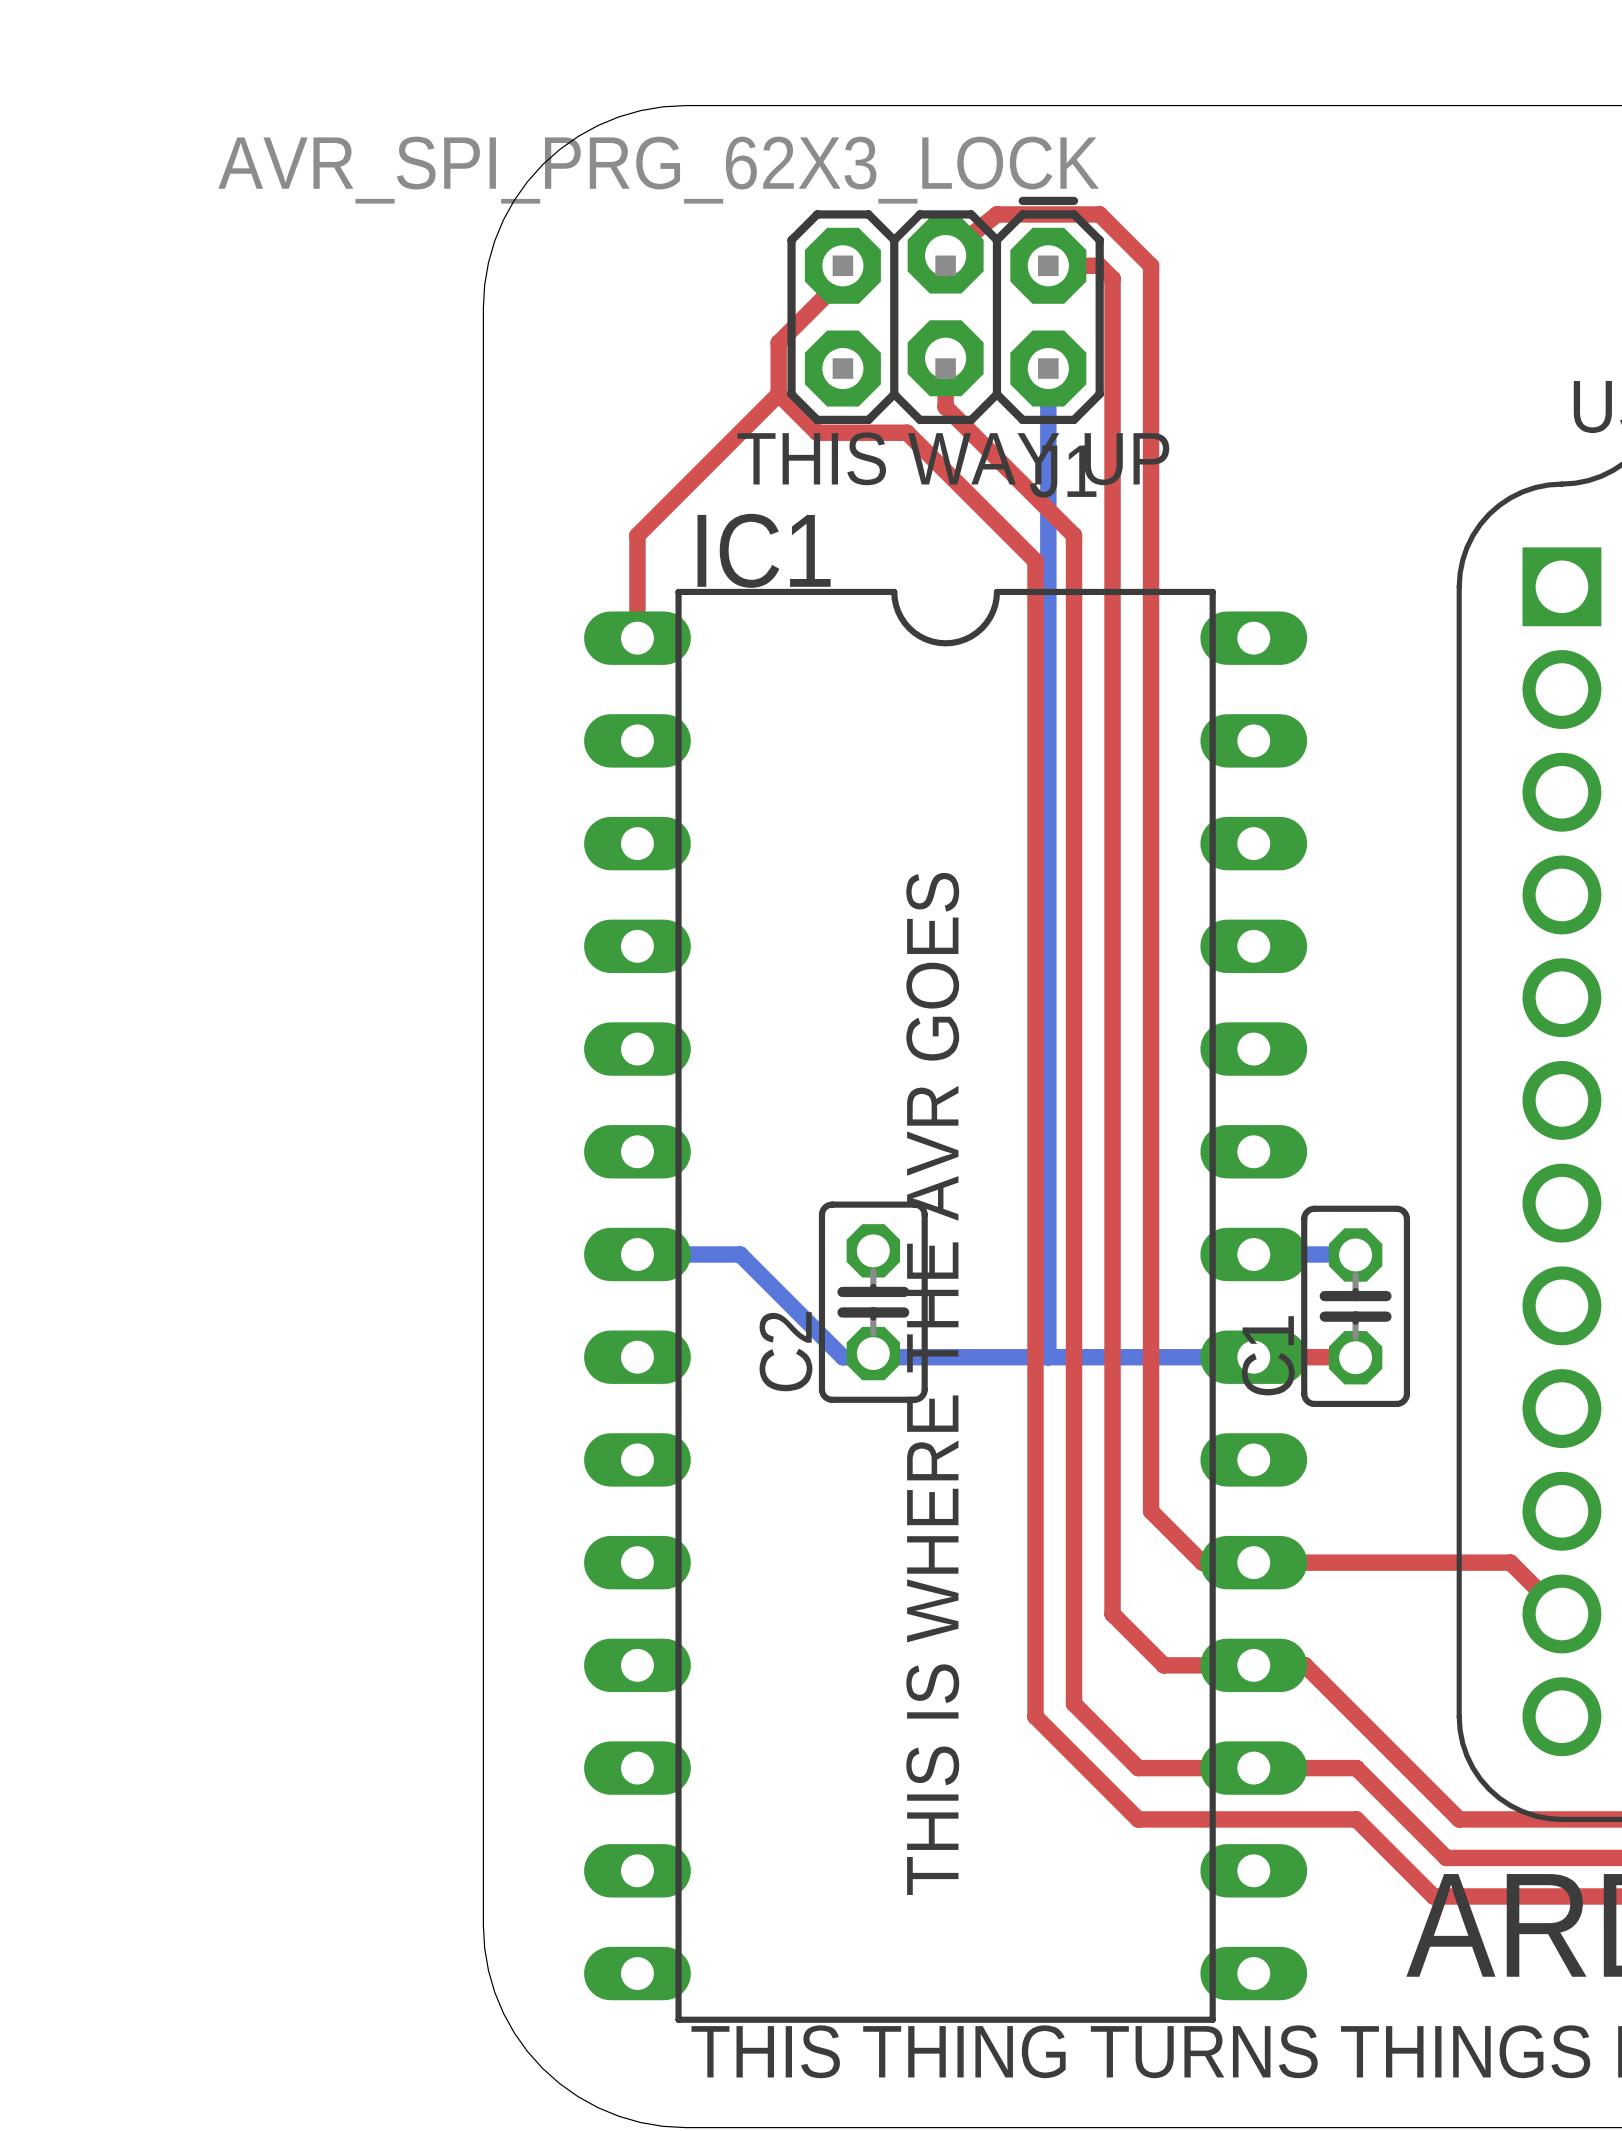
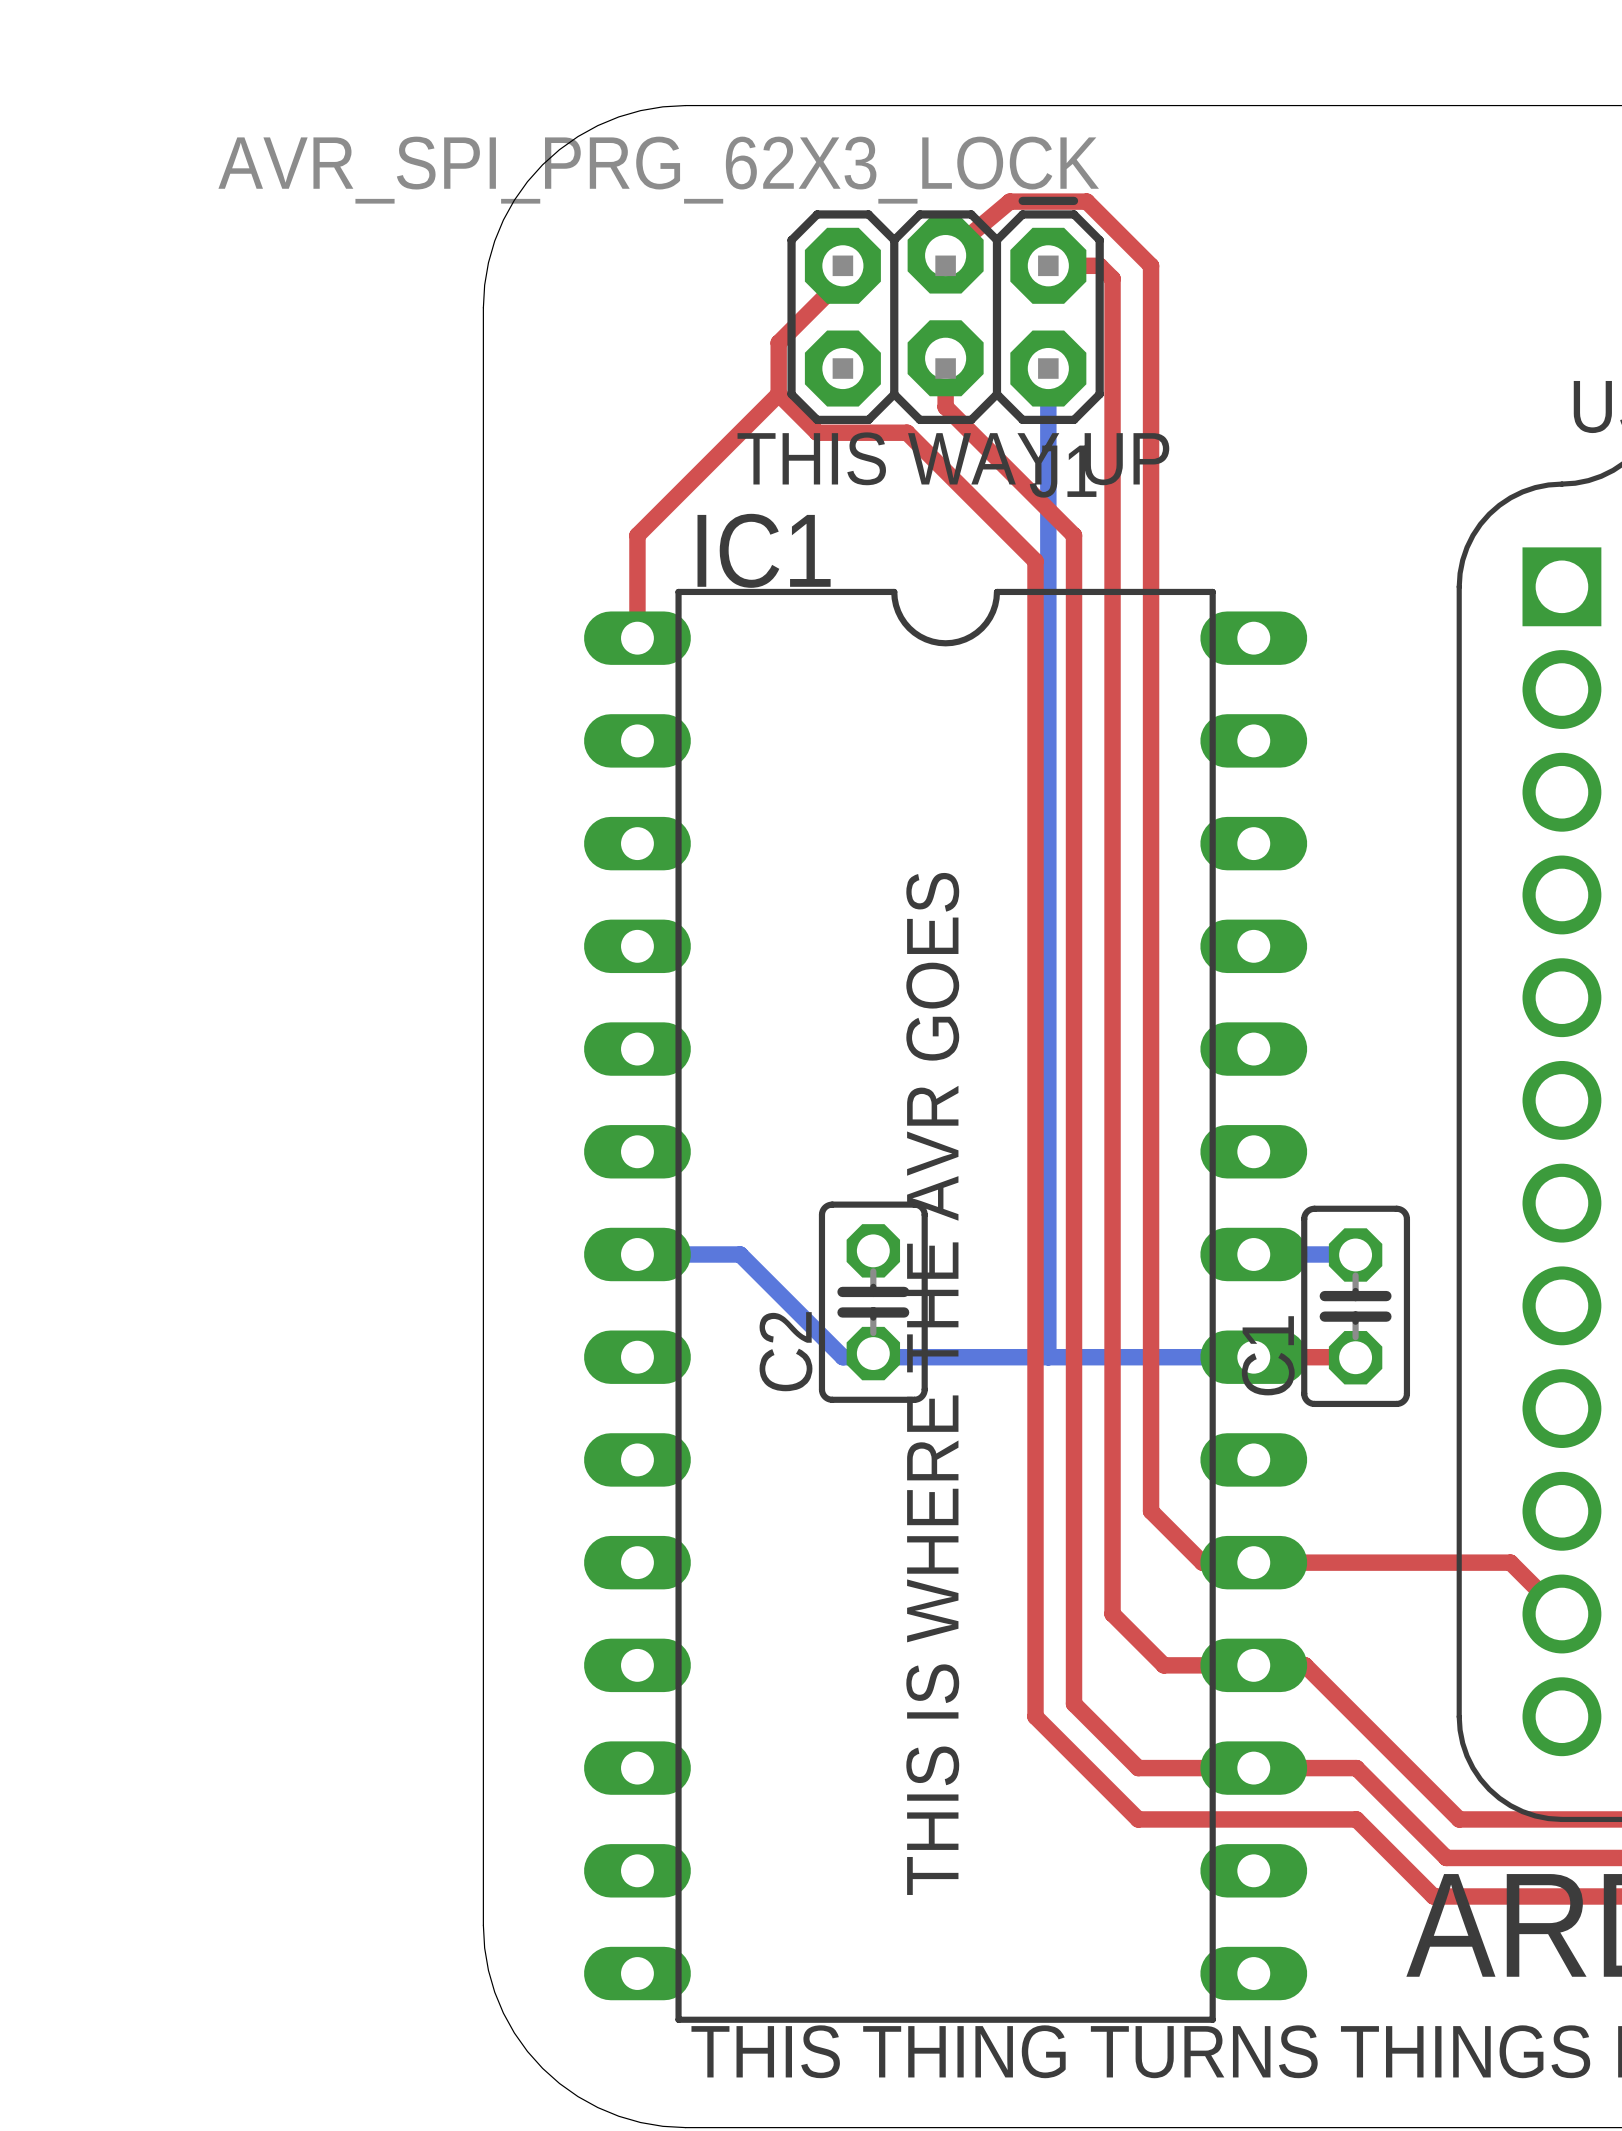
top track: (1099, 214) (996, 214) (945, 255) -> (1099, 214) (1086, 201) (1009, 201) (945, 255)

